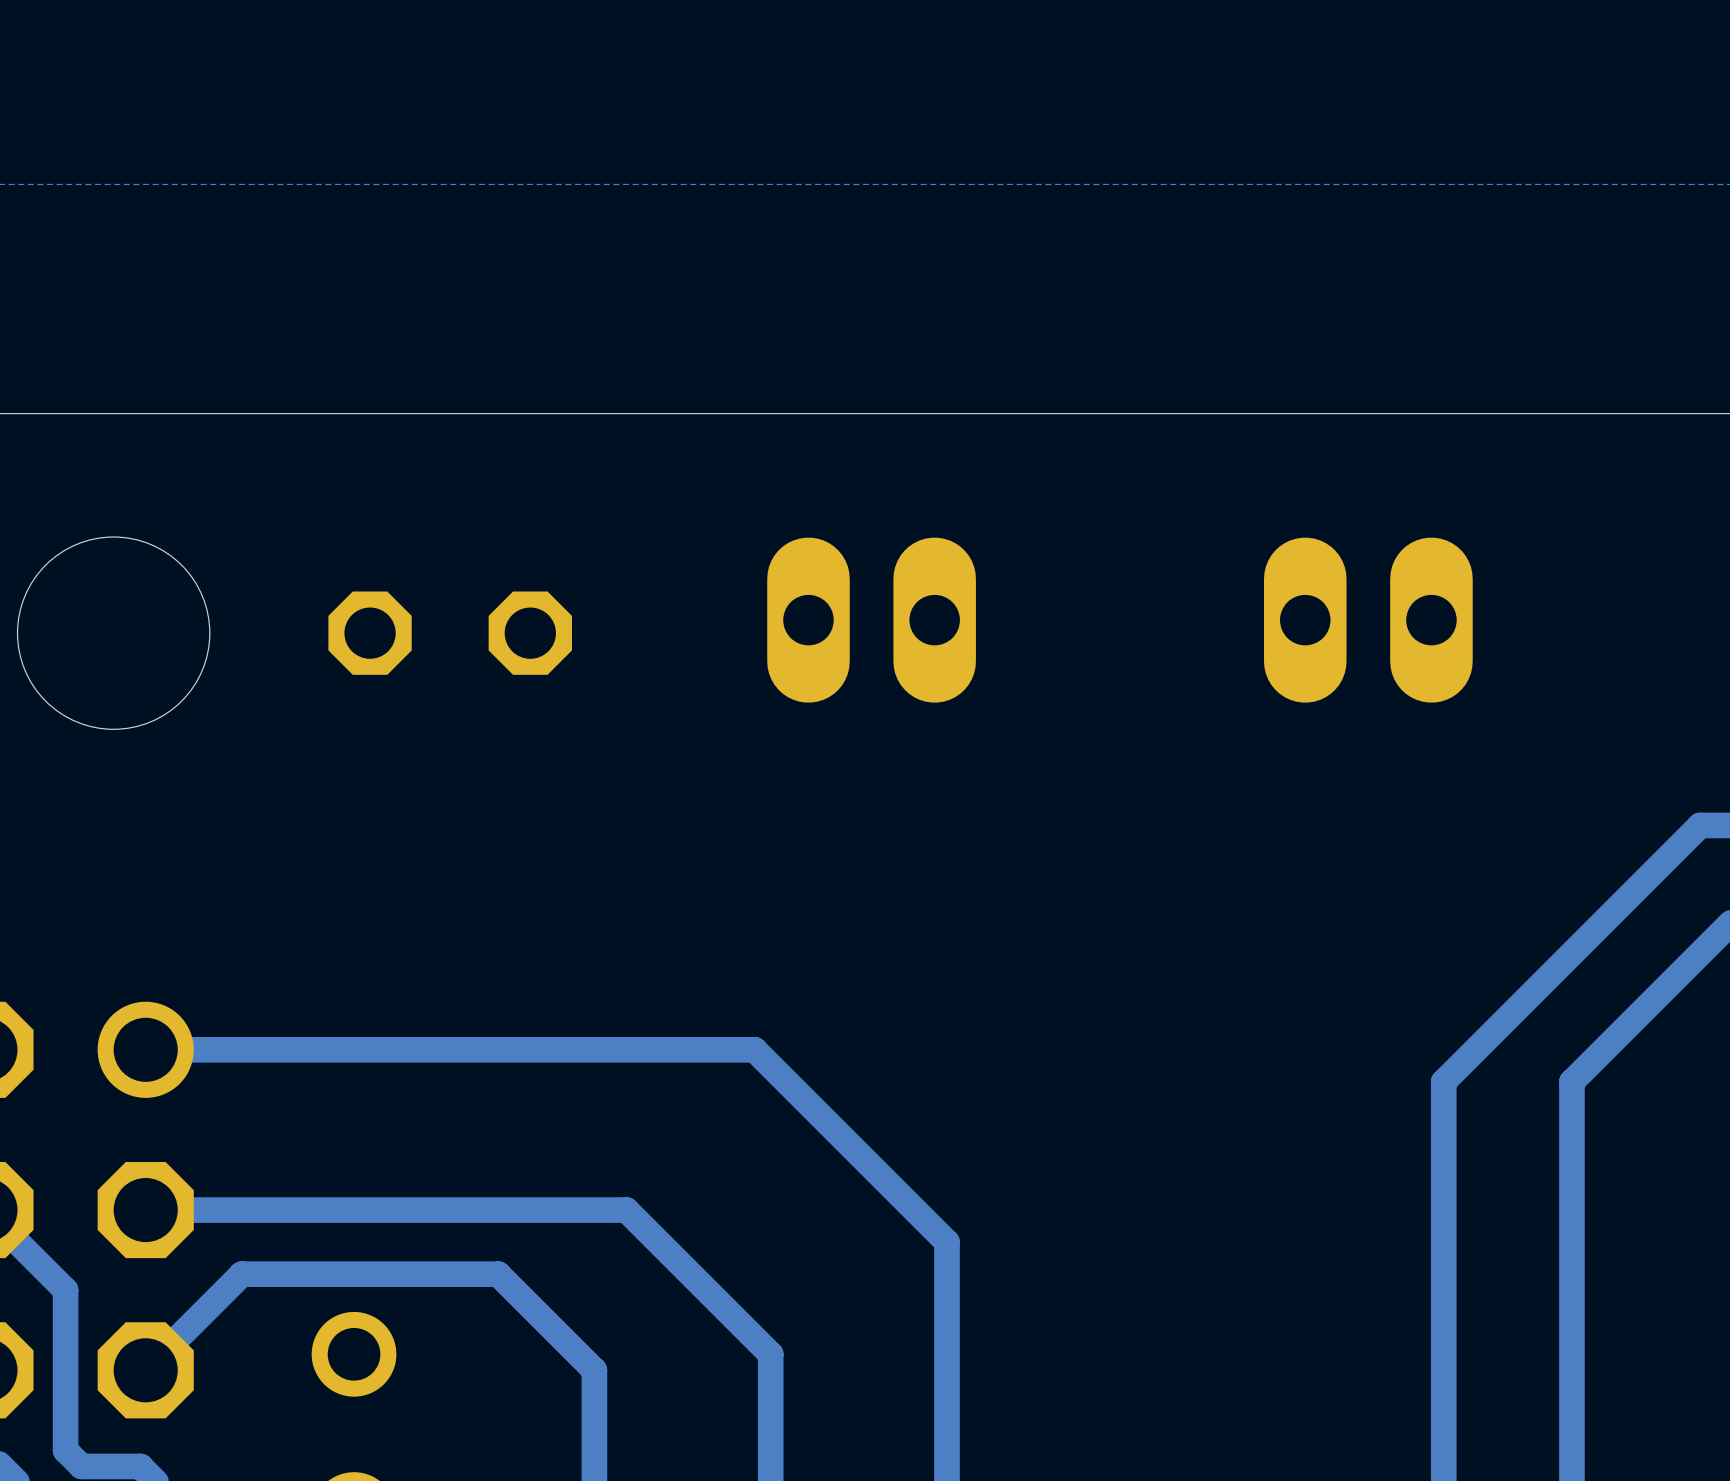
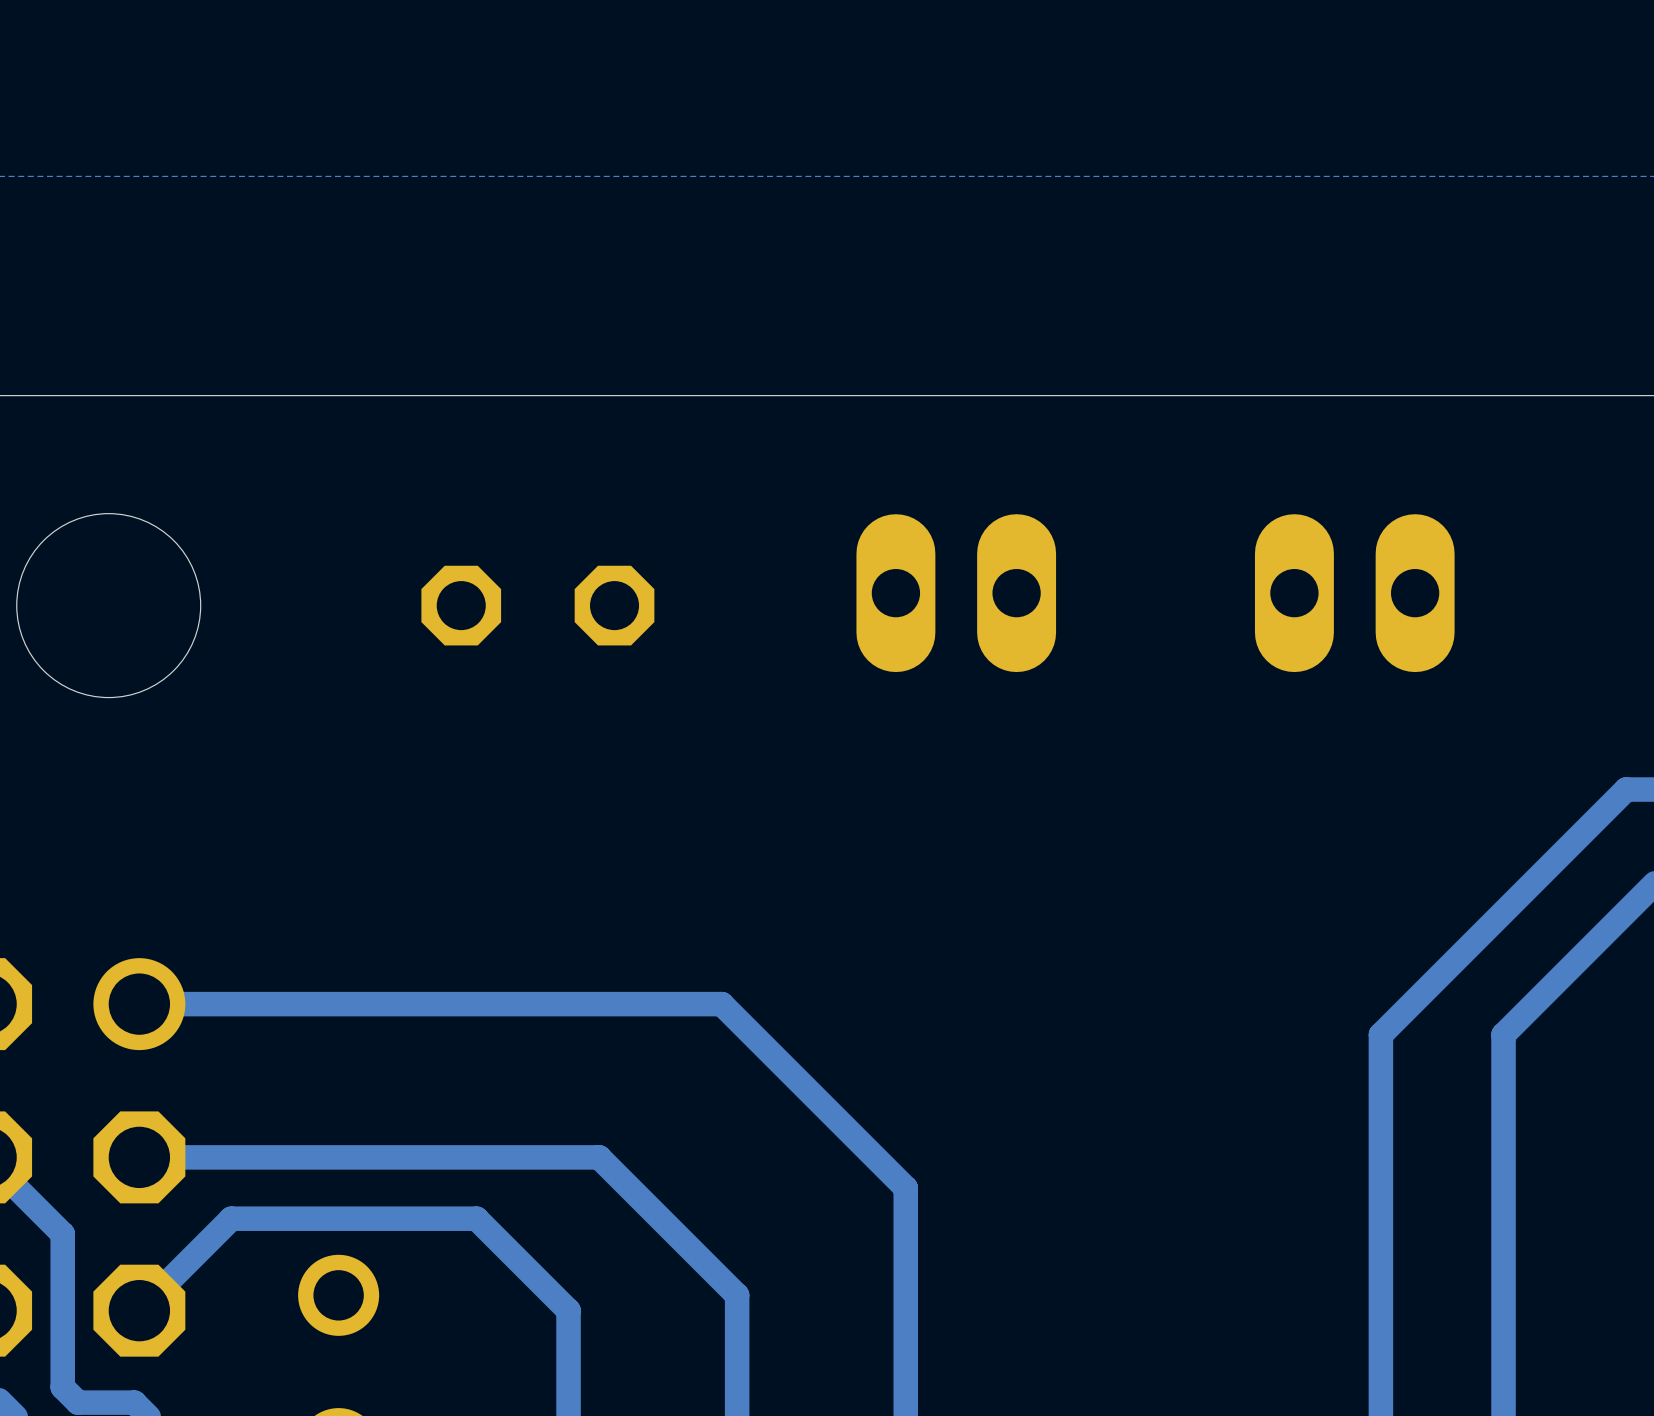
part position: (871, 620) -> (956, 593)
part position: (1368, 620) -> (1354, 593)
part position: (450, 633) -> (537, 605)

